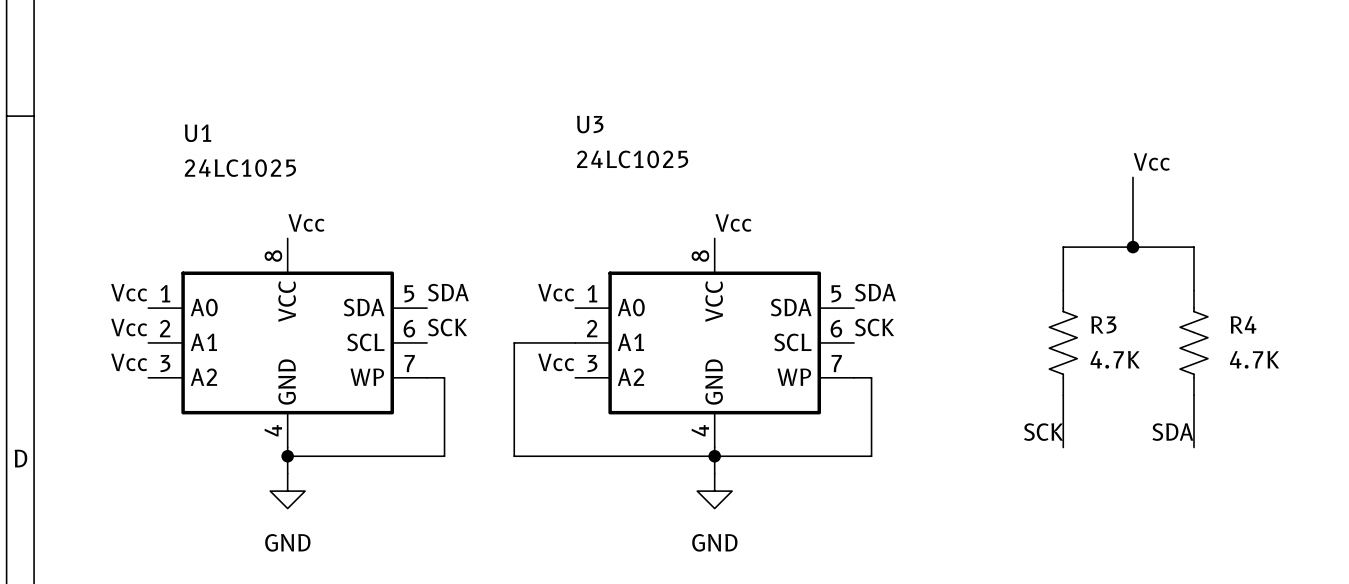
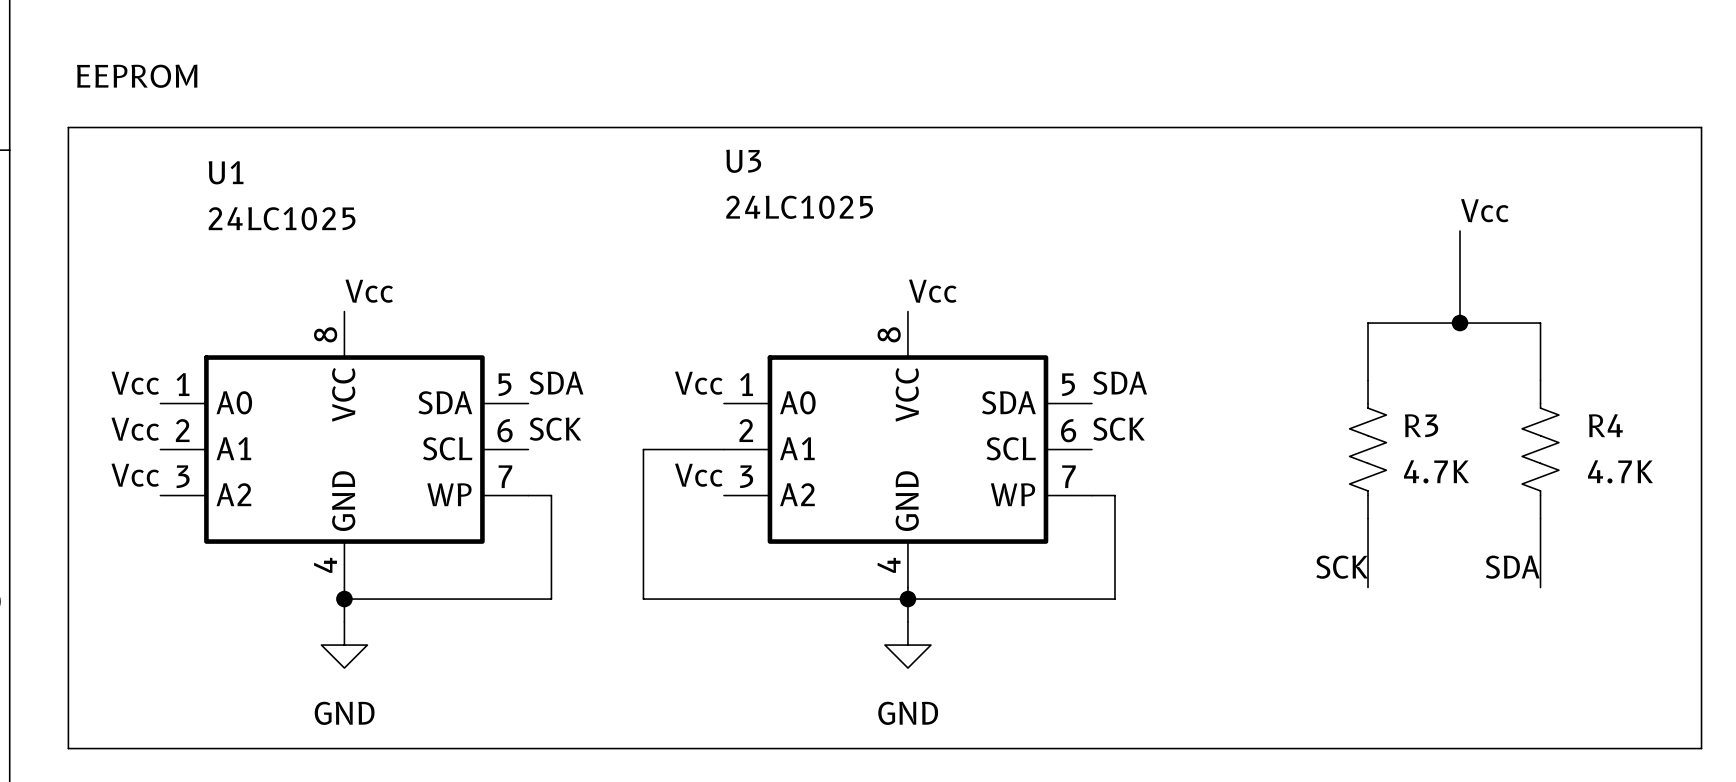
text: none -> EEPROM (137, 76)
line: none -> (68, 127) (1701, 127) (1701, 748) (68, 748) (68, 127)

